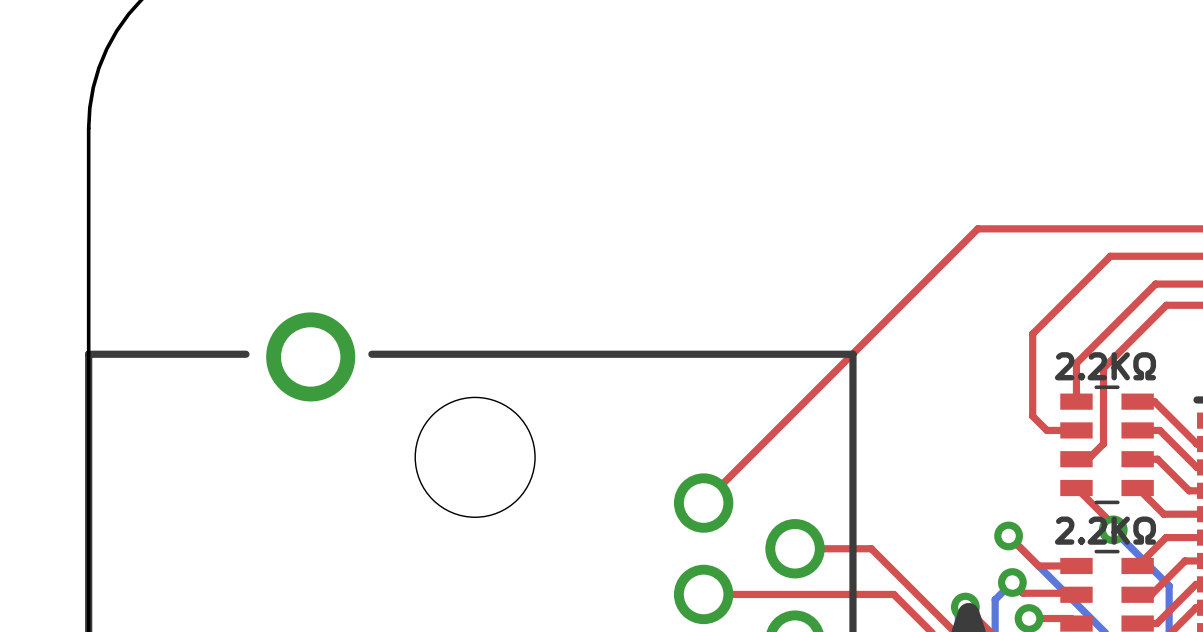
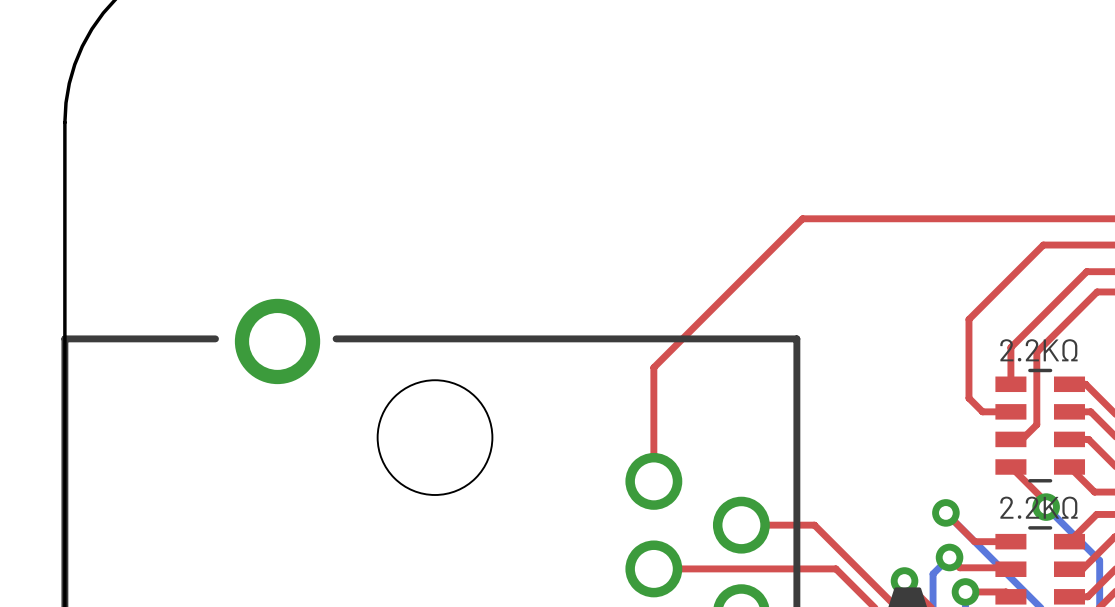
top track: (977, 228) (703, 503) -> (916, 218) (802, 218) (653, 367) (653, 481)

